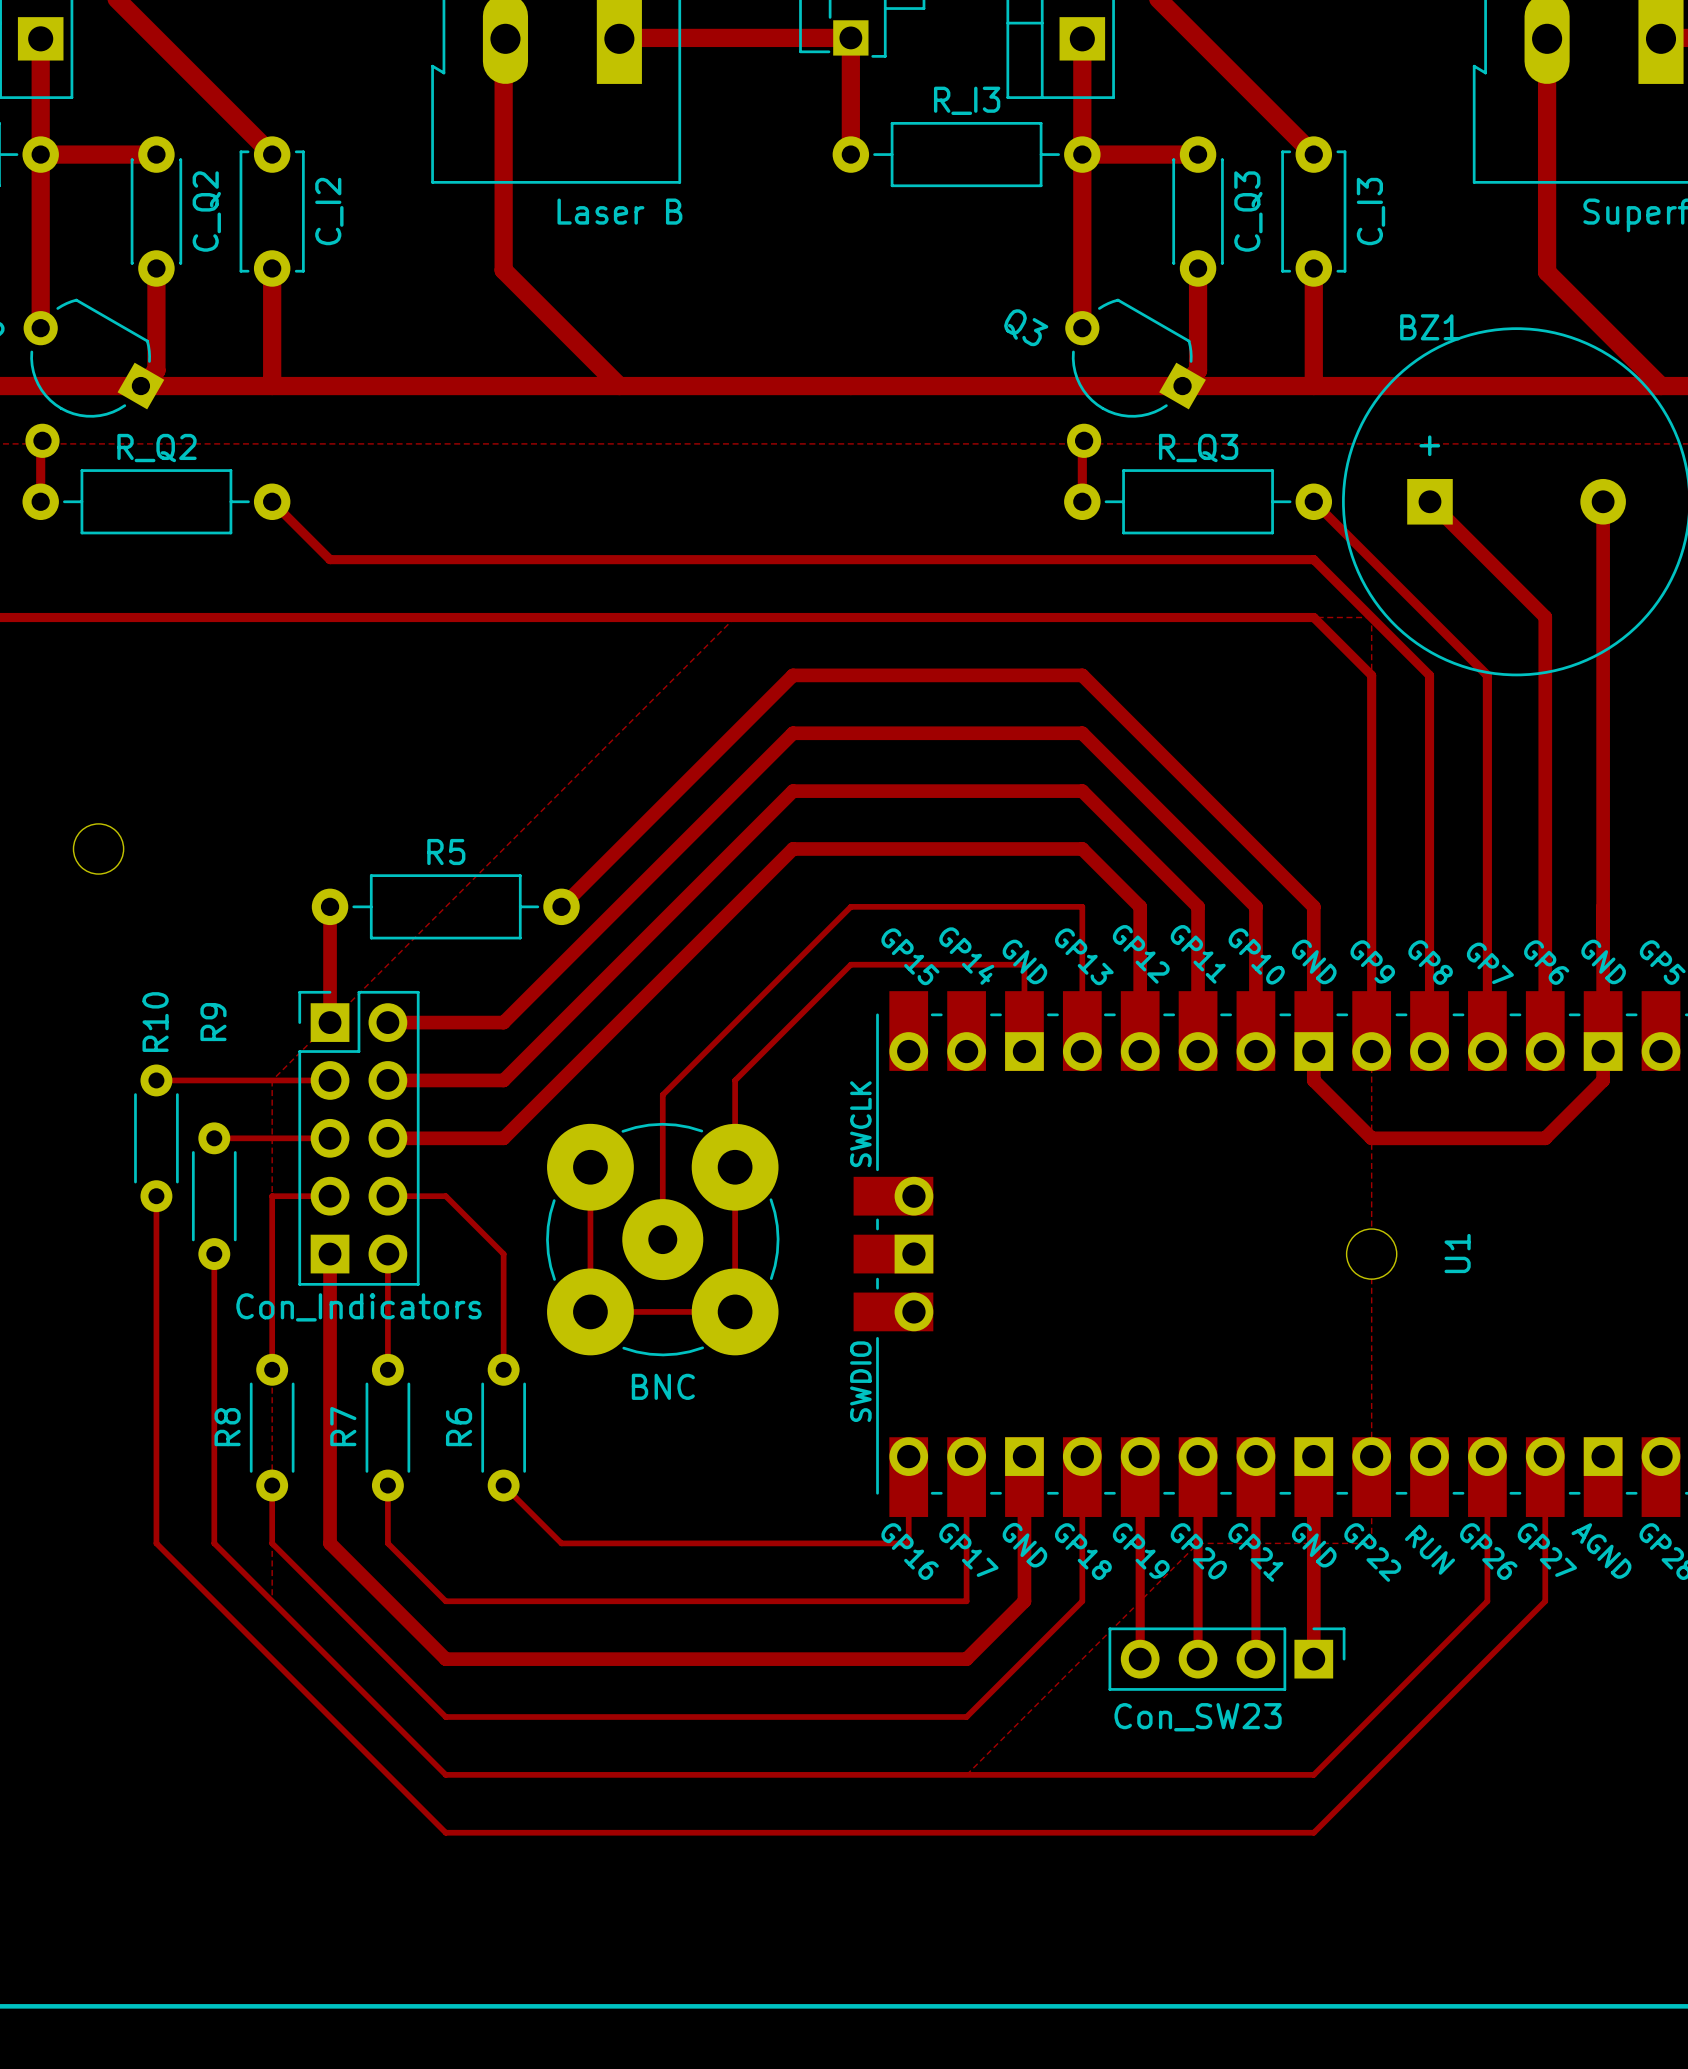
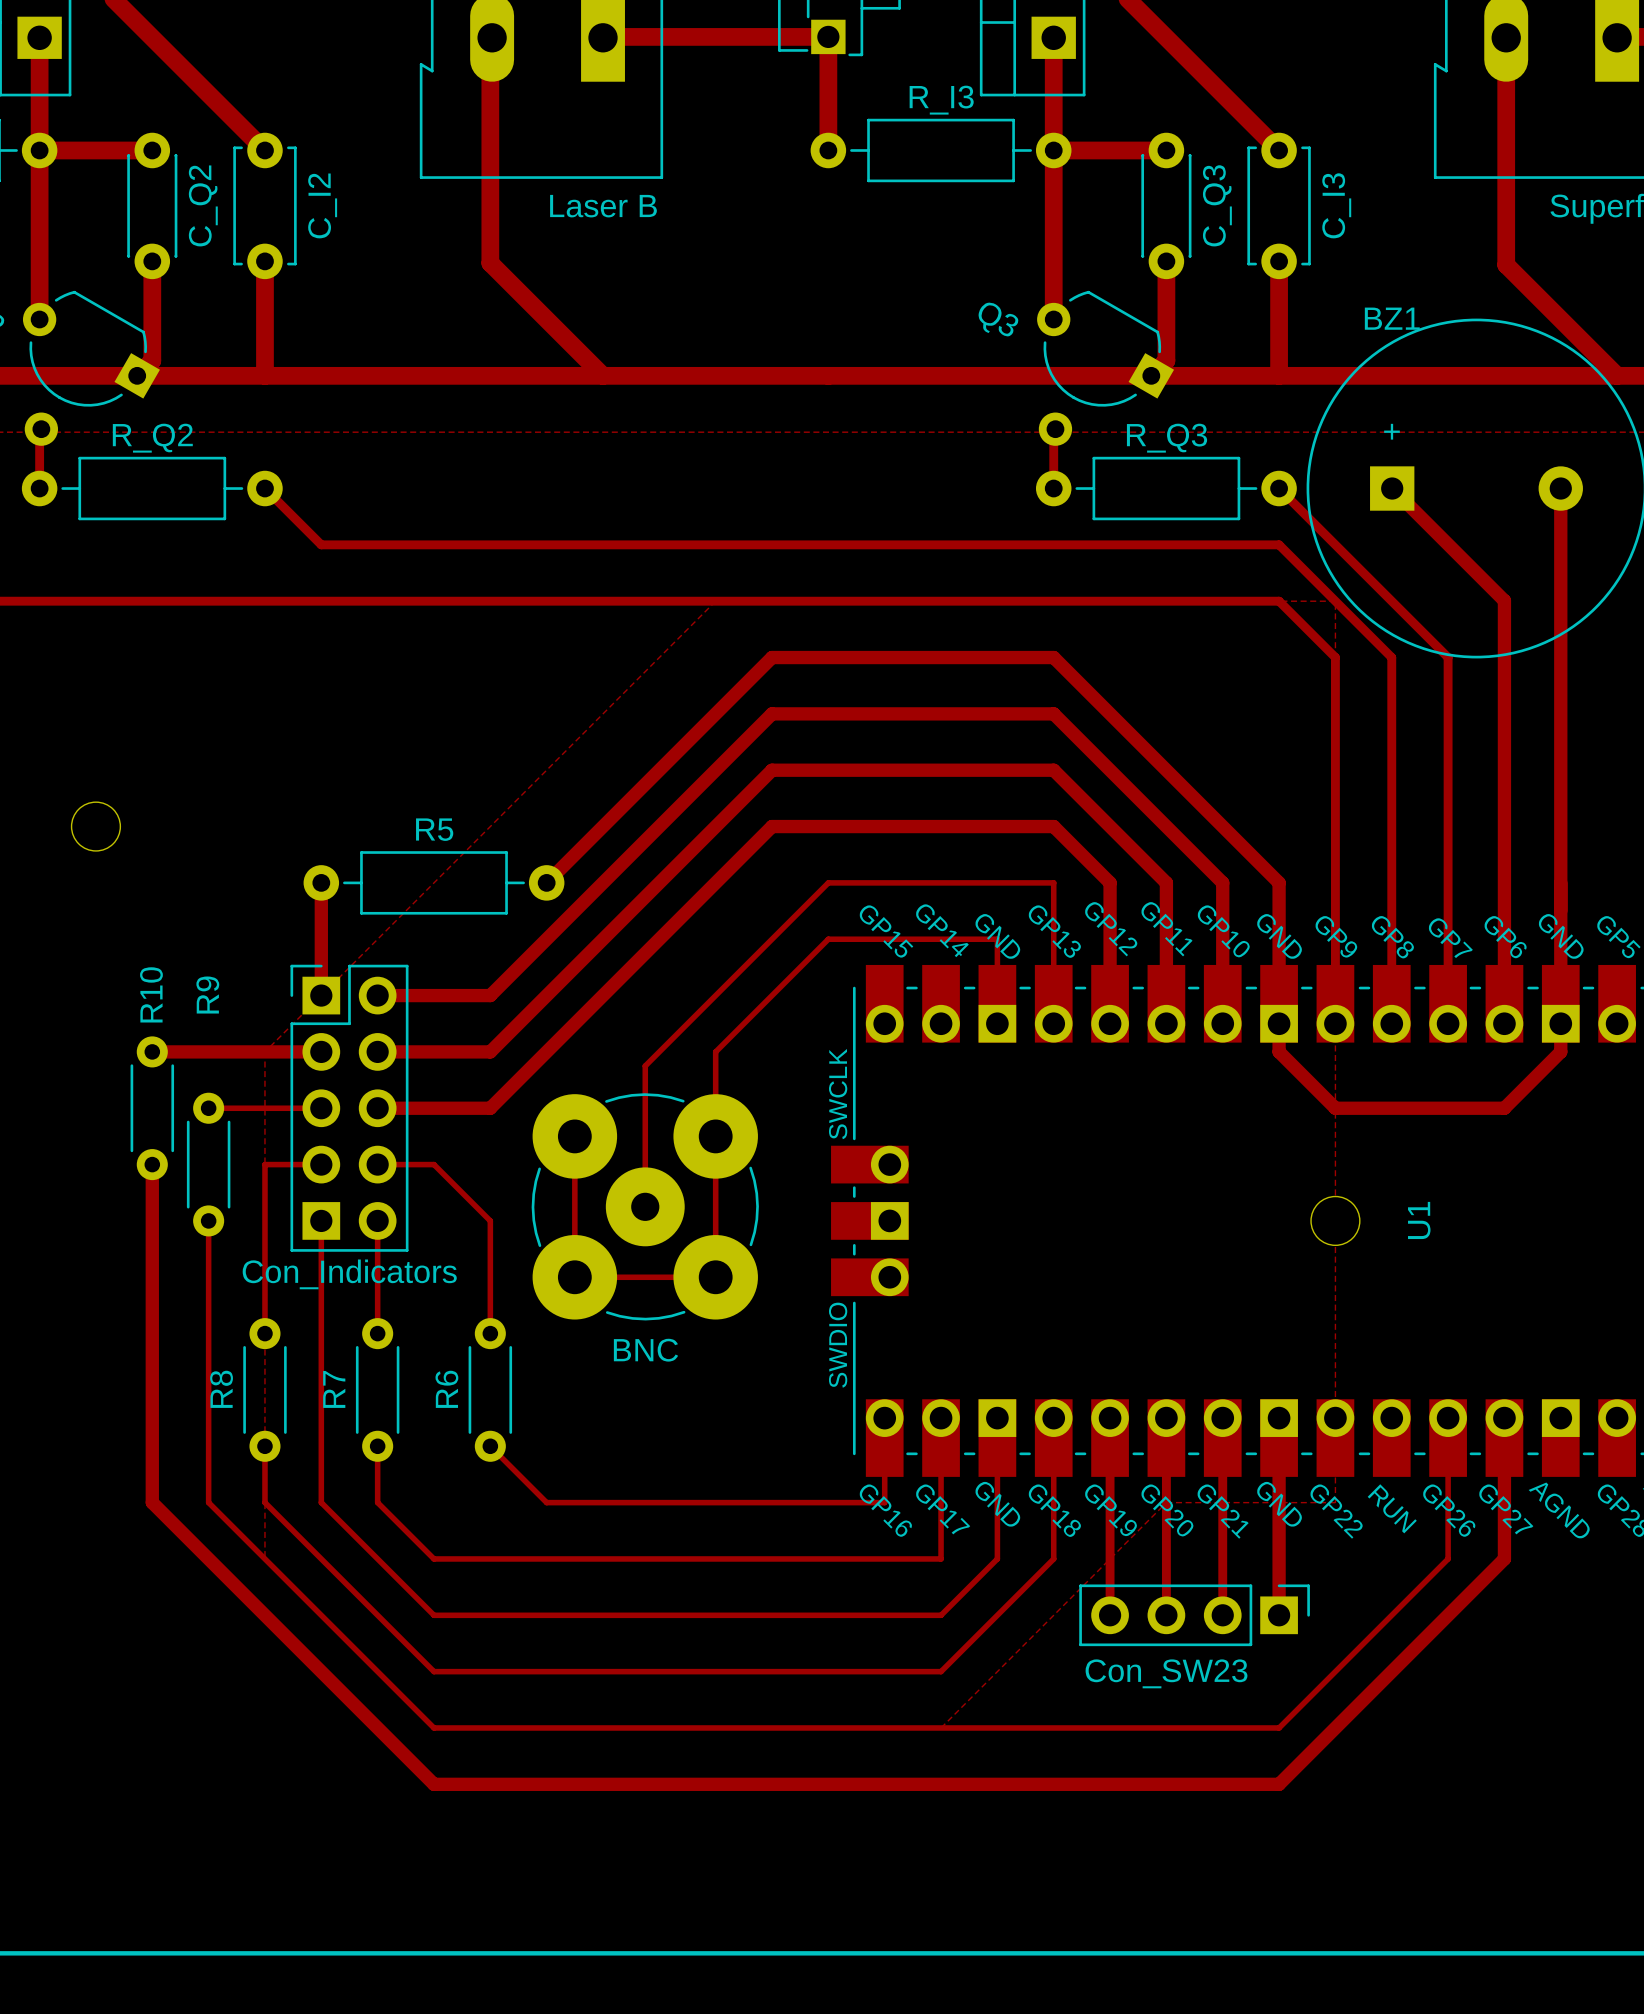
top track width: thin (156, 1080) (330, 1080) -> thick (152, 1051) (321, 1051)
top track width: thin (156, 1196) (156, 1543) (445, 1832) (1313, 1832) (1545, 1601) (1545, 1456) -> thick (152, 1164) (152, 1502) (434, 1784) (1279, 1784) (1504, 1558) (1504, 1418)
top track width: thick (330, 1254) (330, 1543) (445, 1659) (966, 1659) (1024, 1601) (1024, 1456) -> thin (321, 1220) (321, 1502) (434, 1615) (941, 1615) (997, 1558) (997, 1418)

